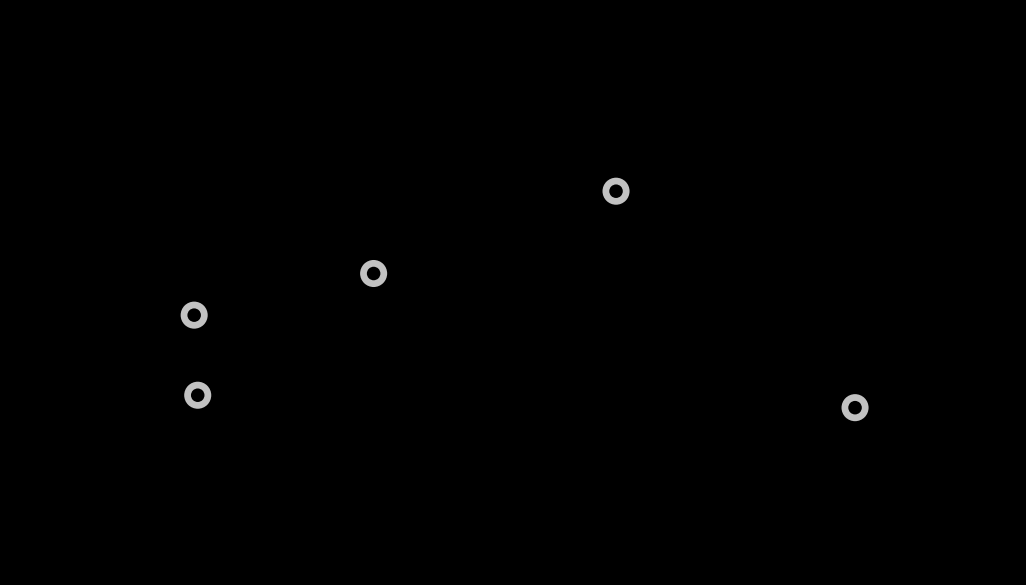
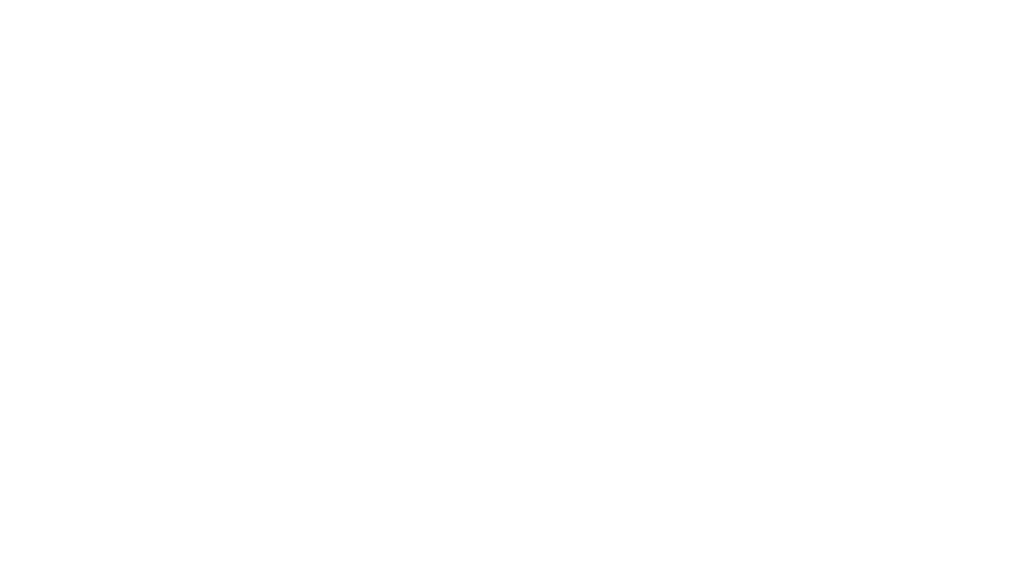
via: (616, 191) -> none
via: (373, 273) -> none
via: (194, 315) -> none
via: (197, 395) -> none
via: (855, 407) -> none

